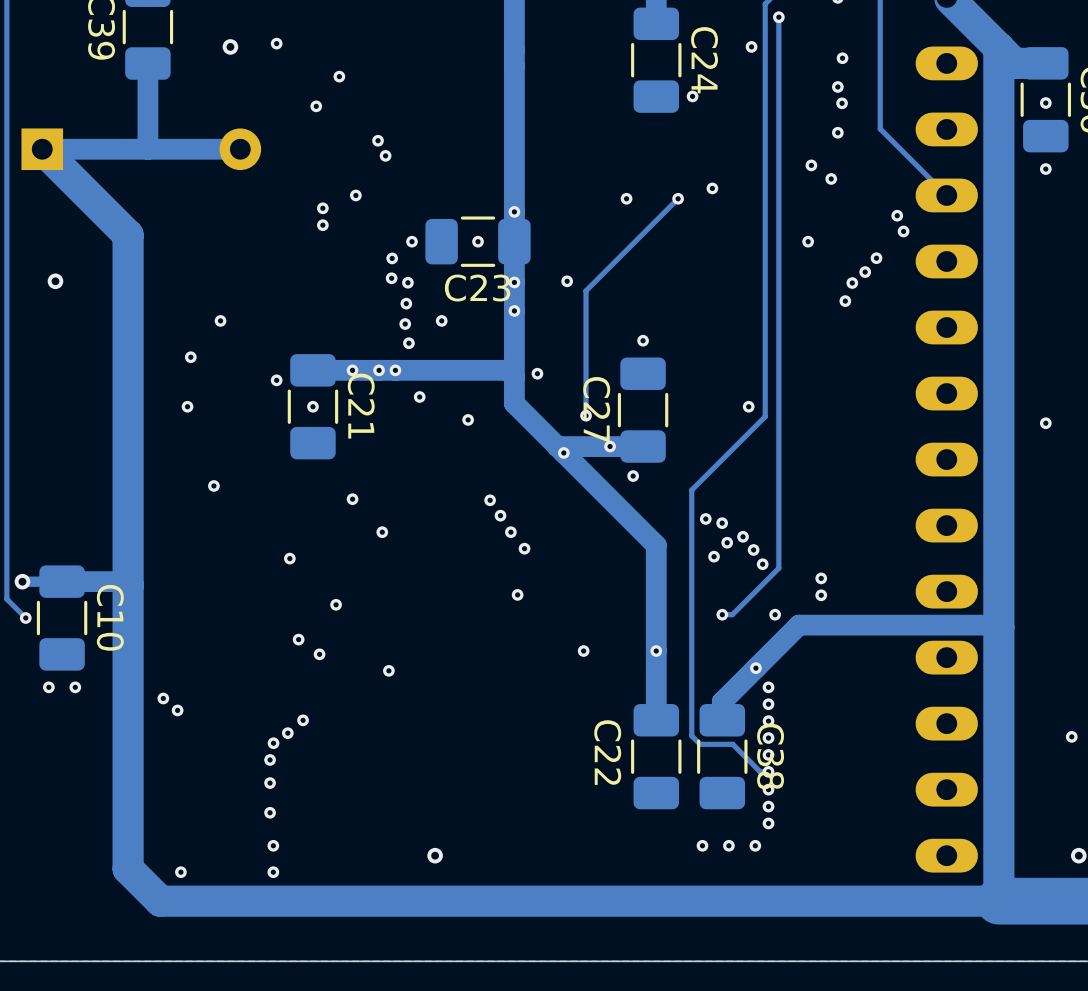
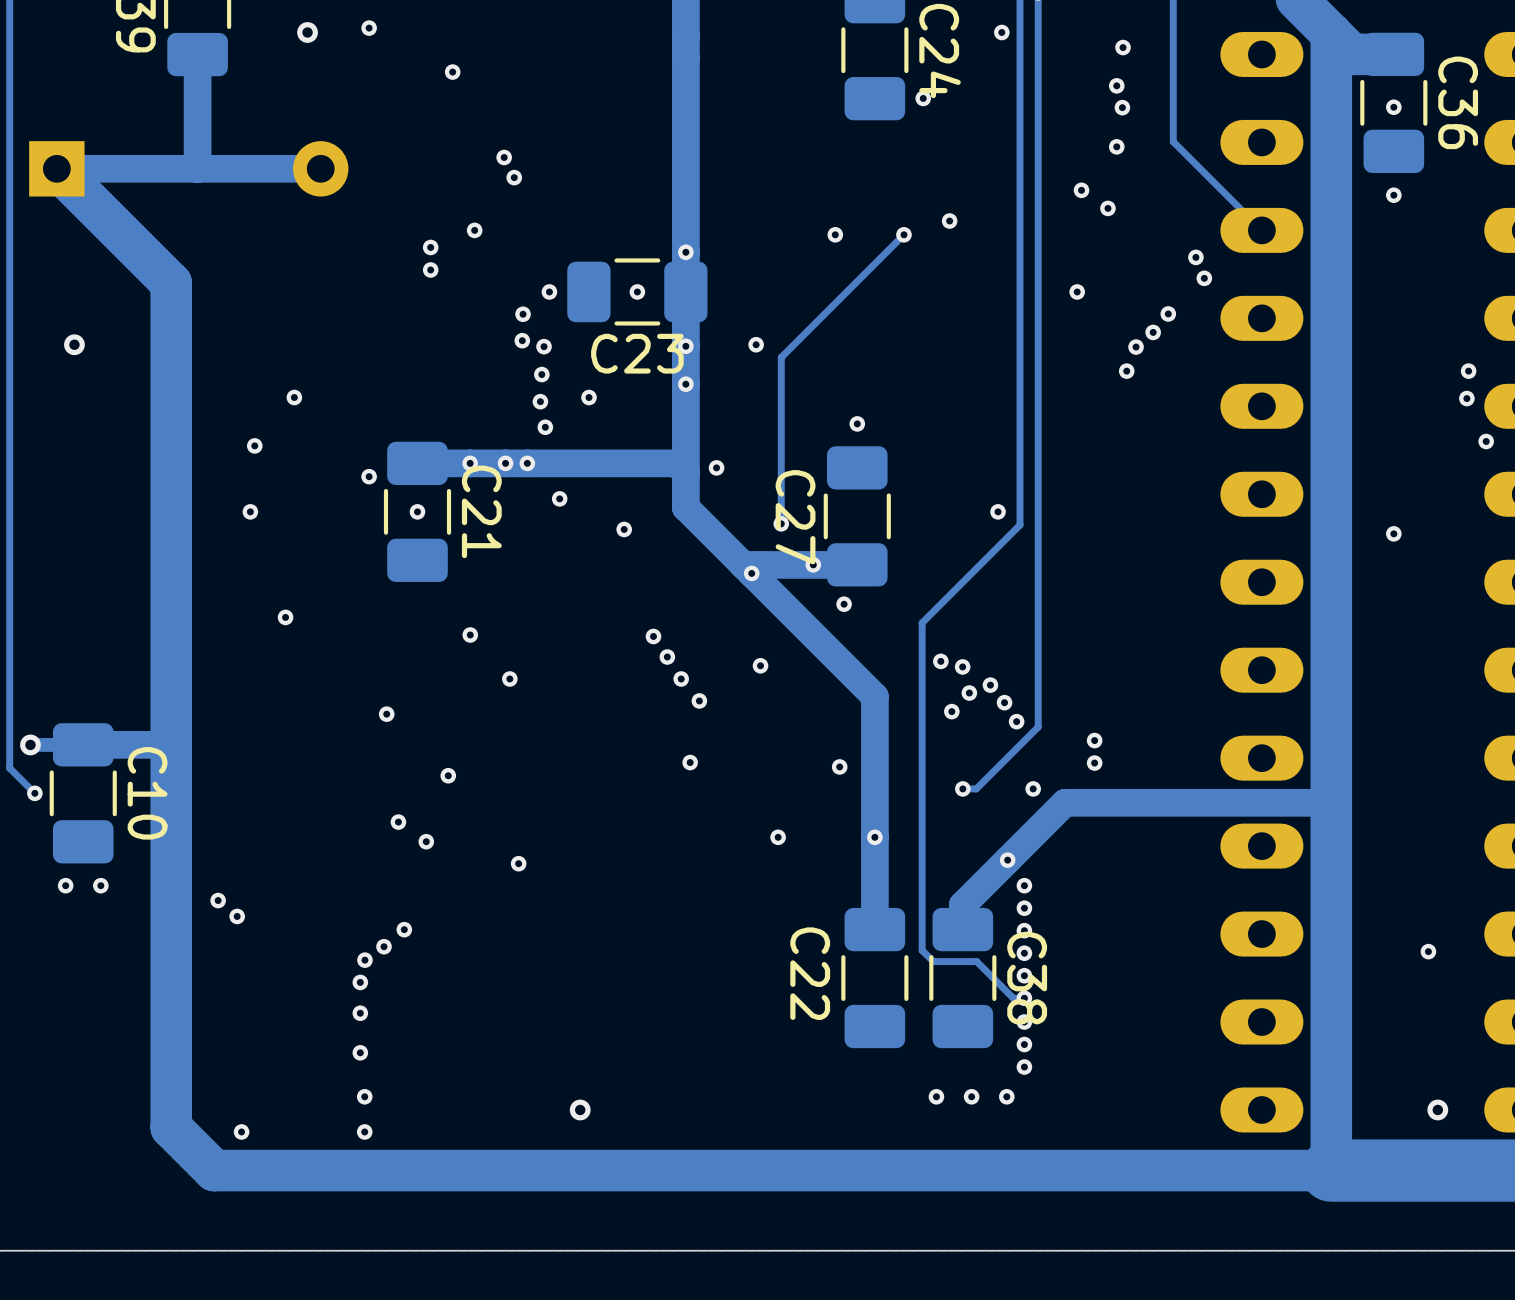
via: (316, 106) -> none
via: none -> (760, 665)
via: none -> (839, 766)

